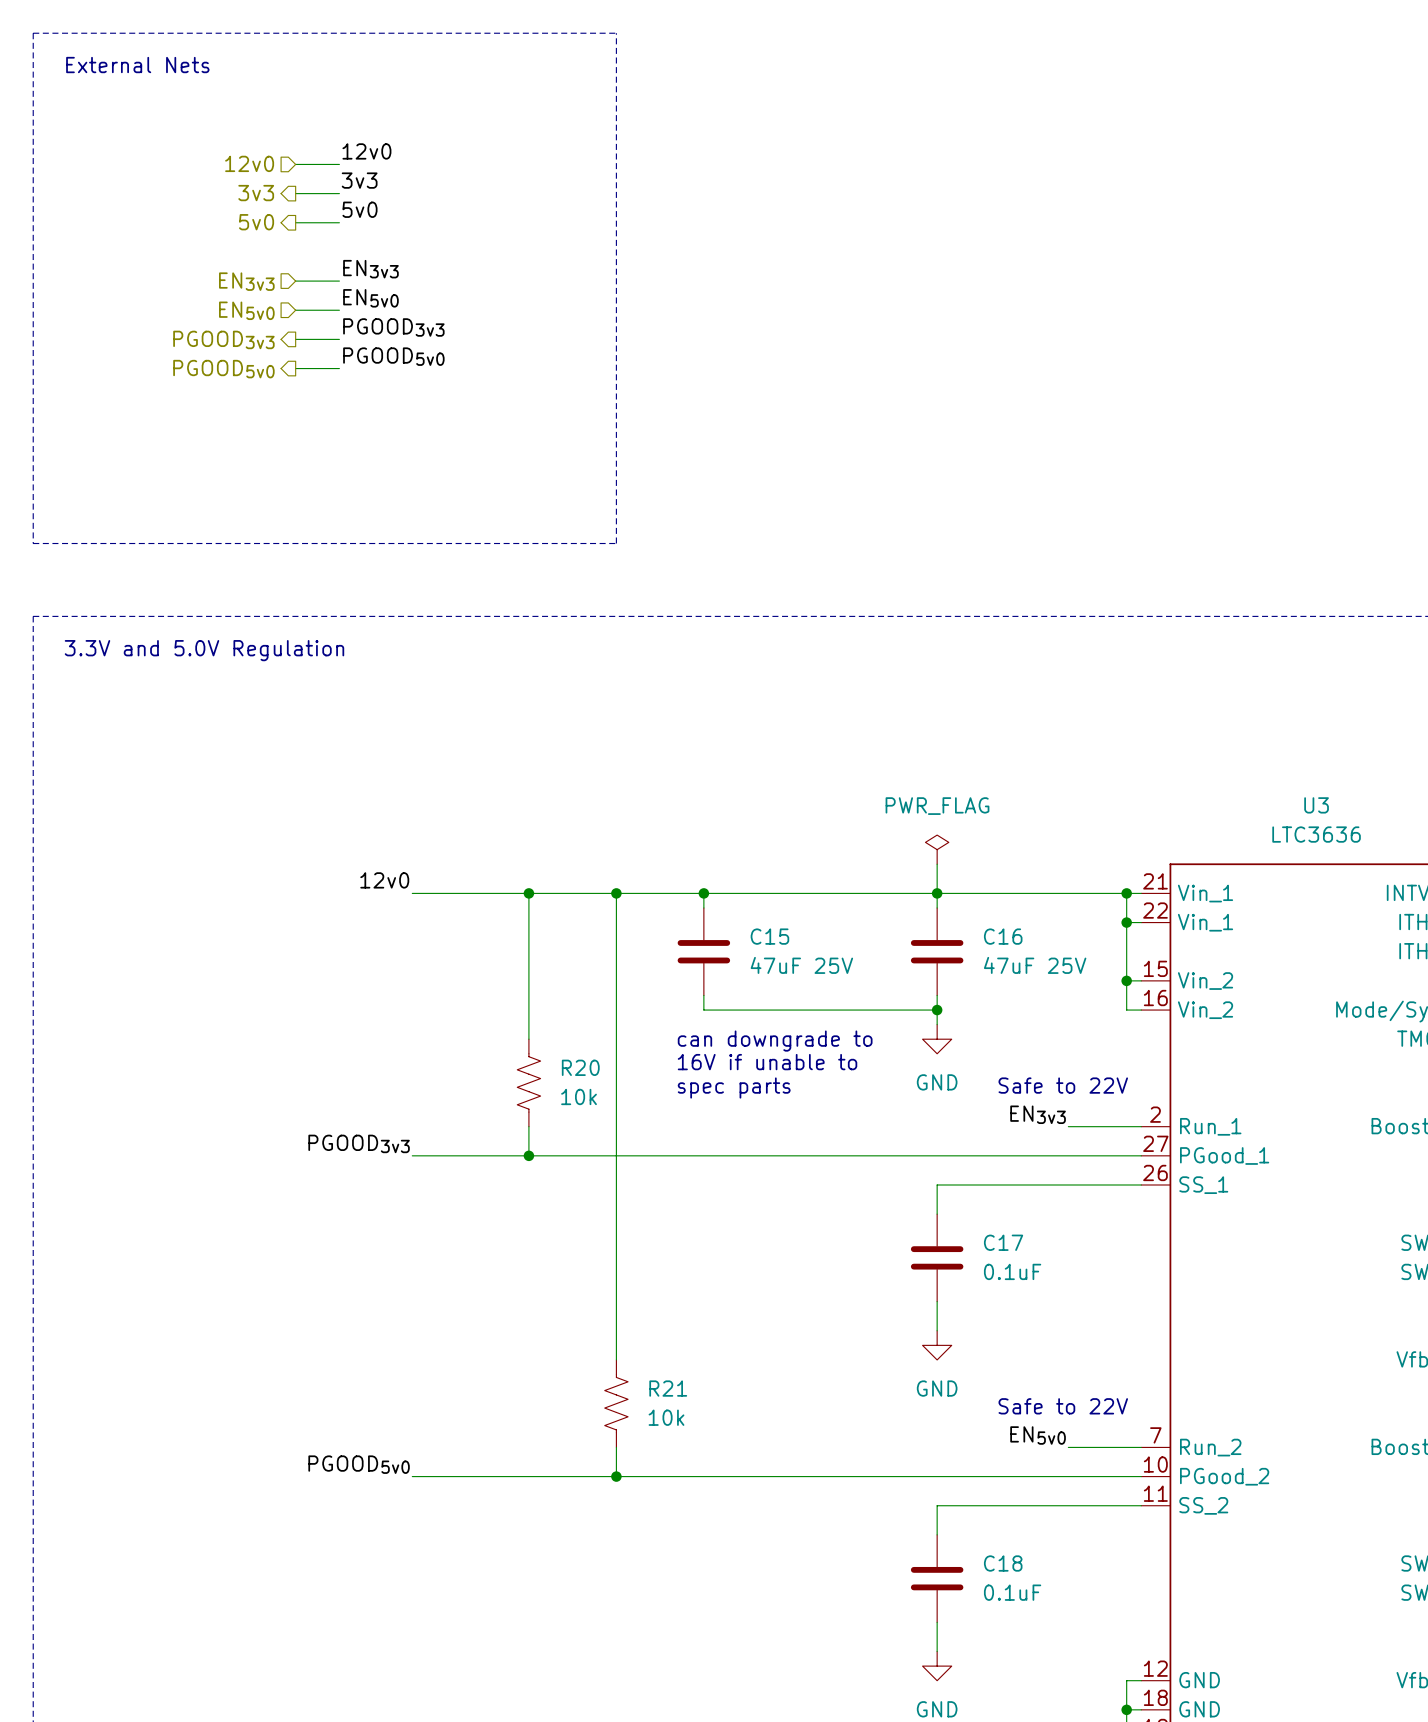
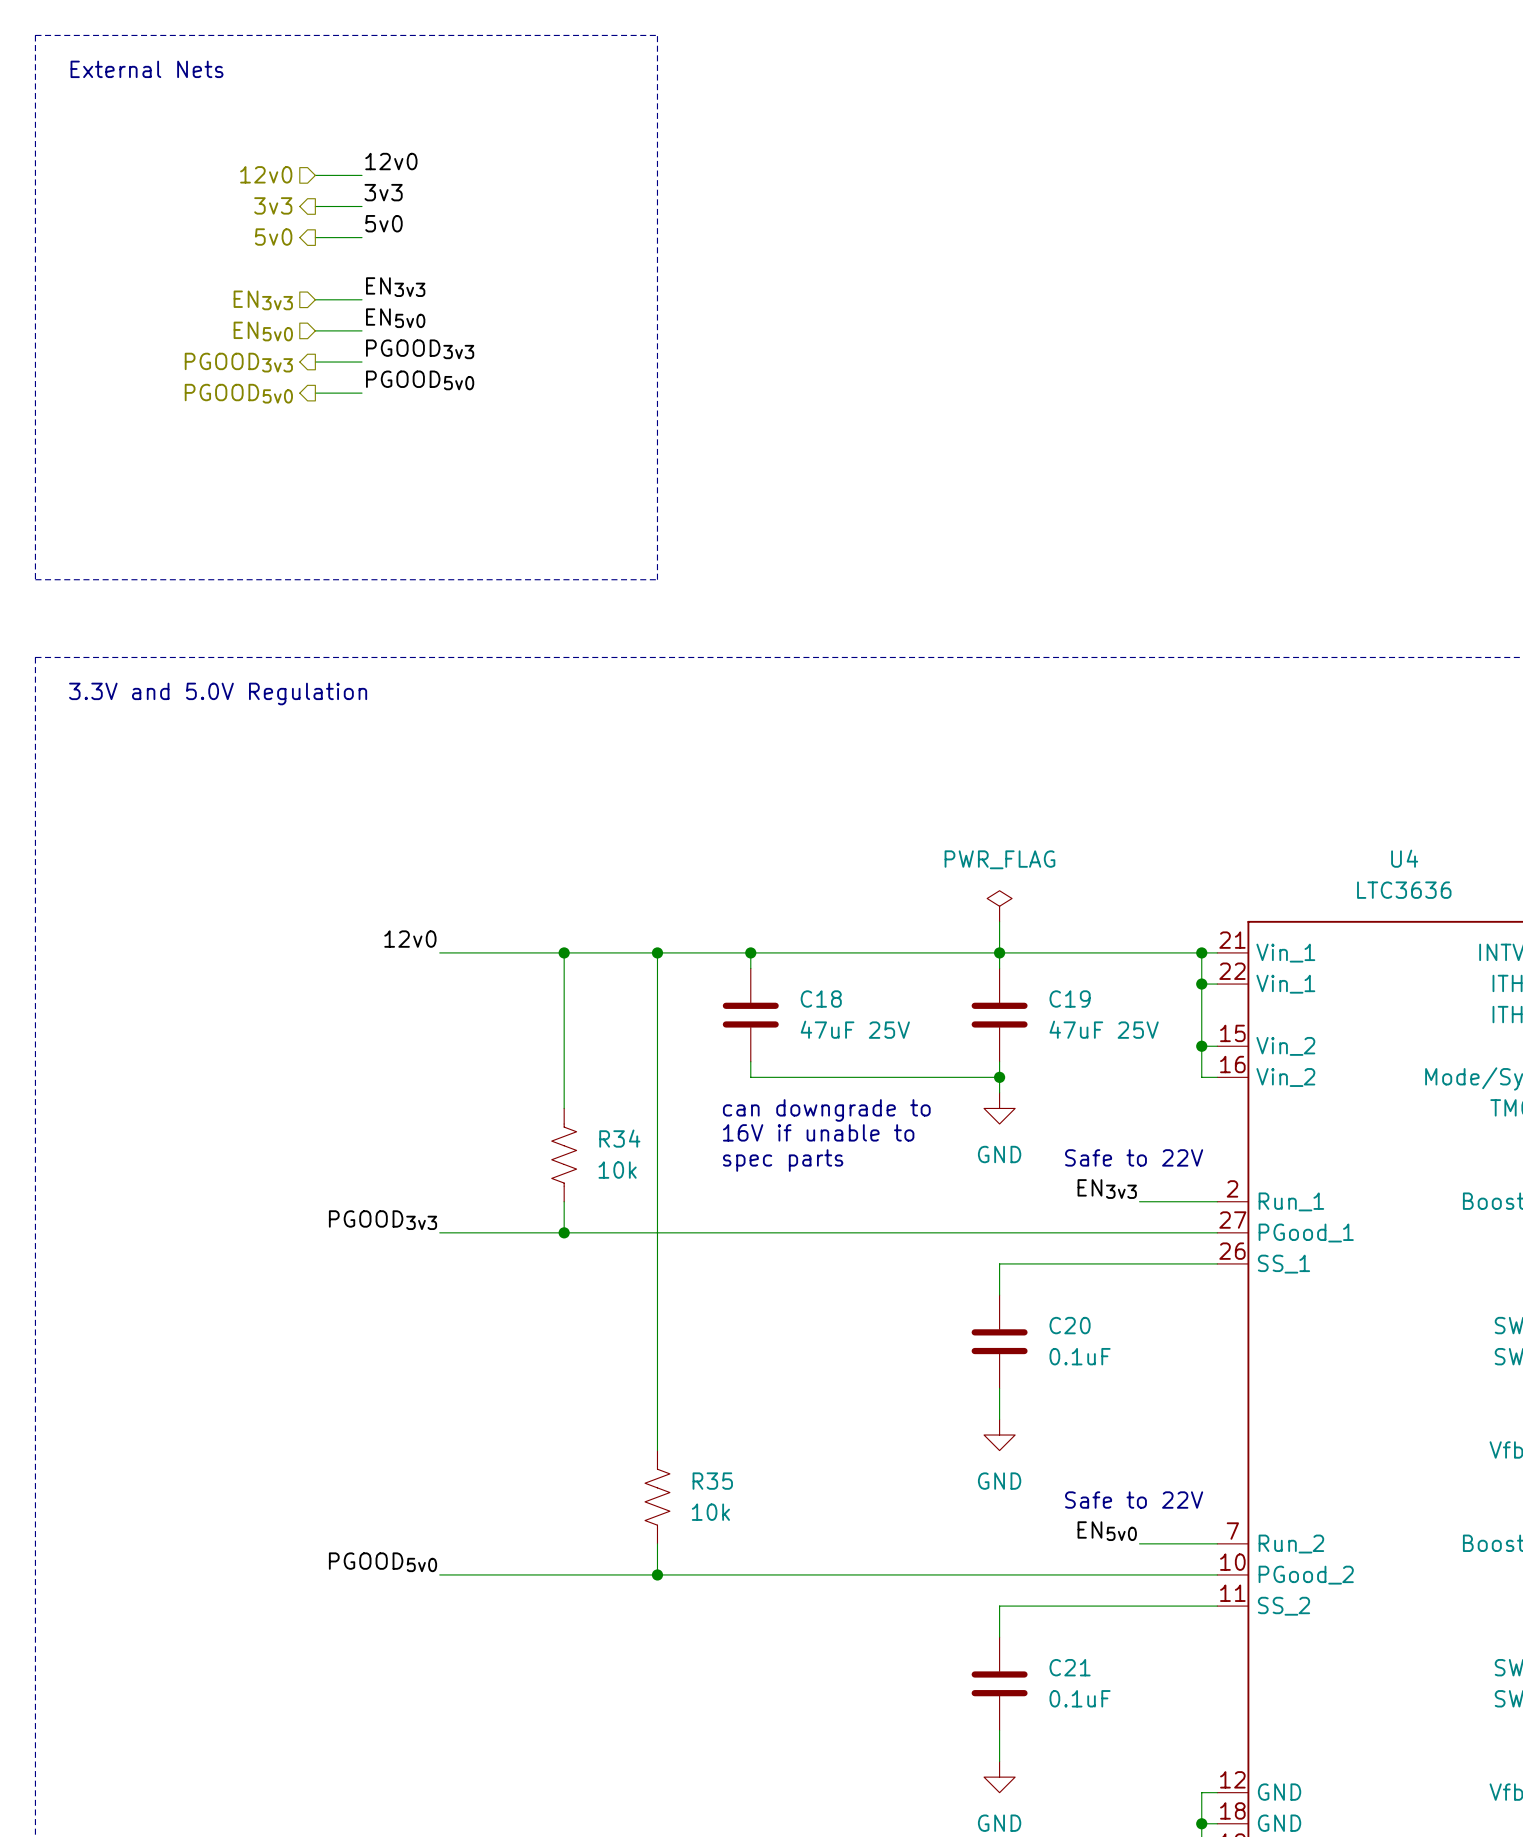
U3 name: U3 (1316, 805) -> U4 (1404, 858)
C15 name: C15 (769, 936) -> C18 (821, 999)
C16 name: C16 (1003, 936) -> C19 (1070, 999)
R20 name: R20 (580, 1067) -> R34 (619, 1138)
C17 name: C17 (1003, 1242) -> C20 (1070, 1325)
R21 name: R21 (668, 1388) -> R35 (712, 1481)
C18 name: C18 (1003, 1563) -> C21 (1070, 1667)

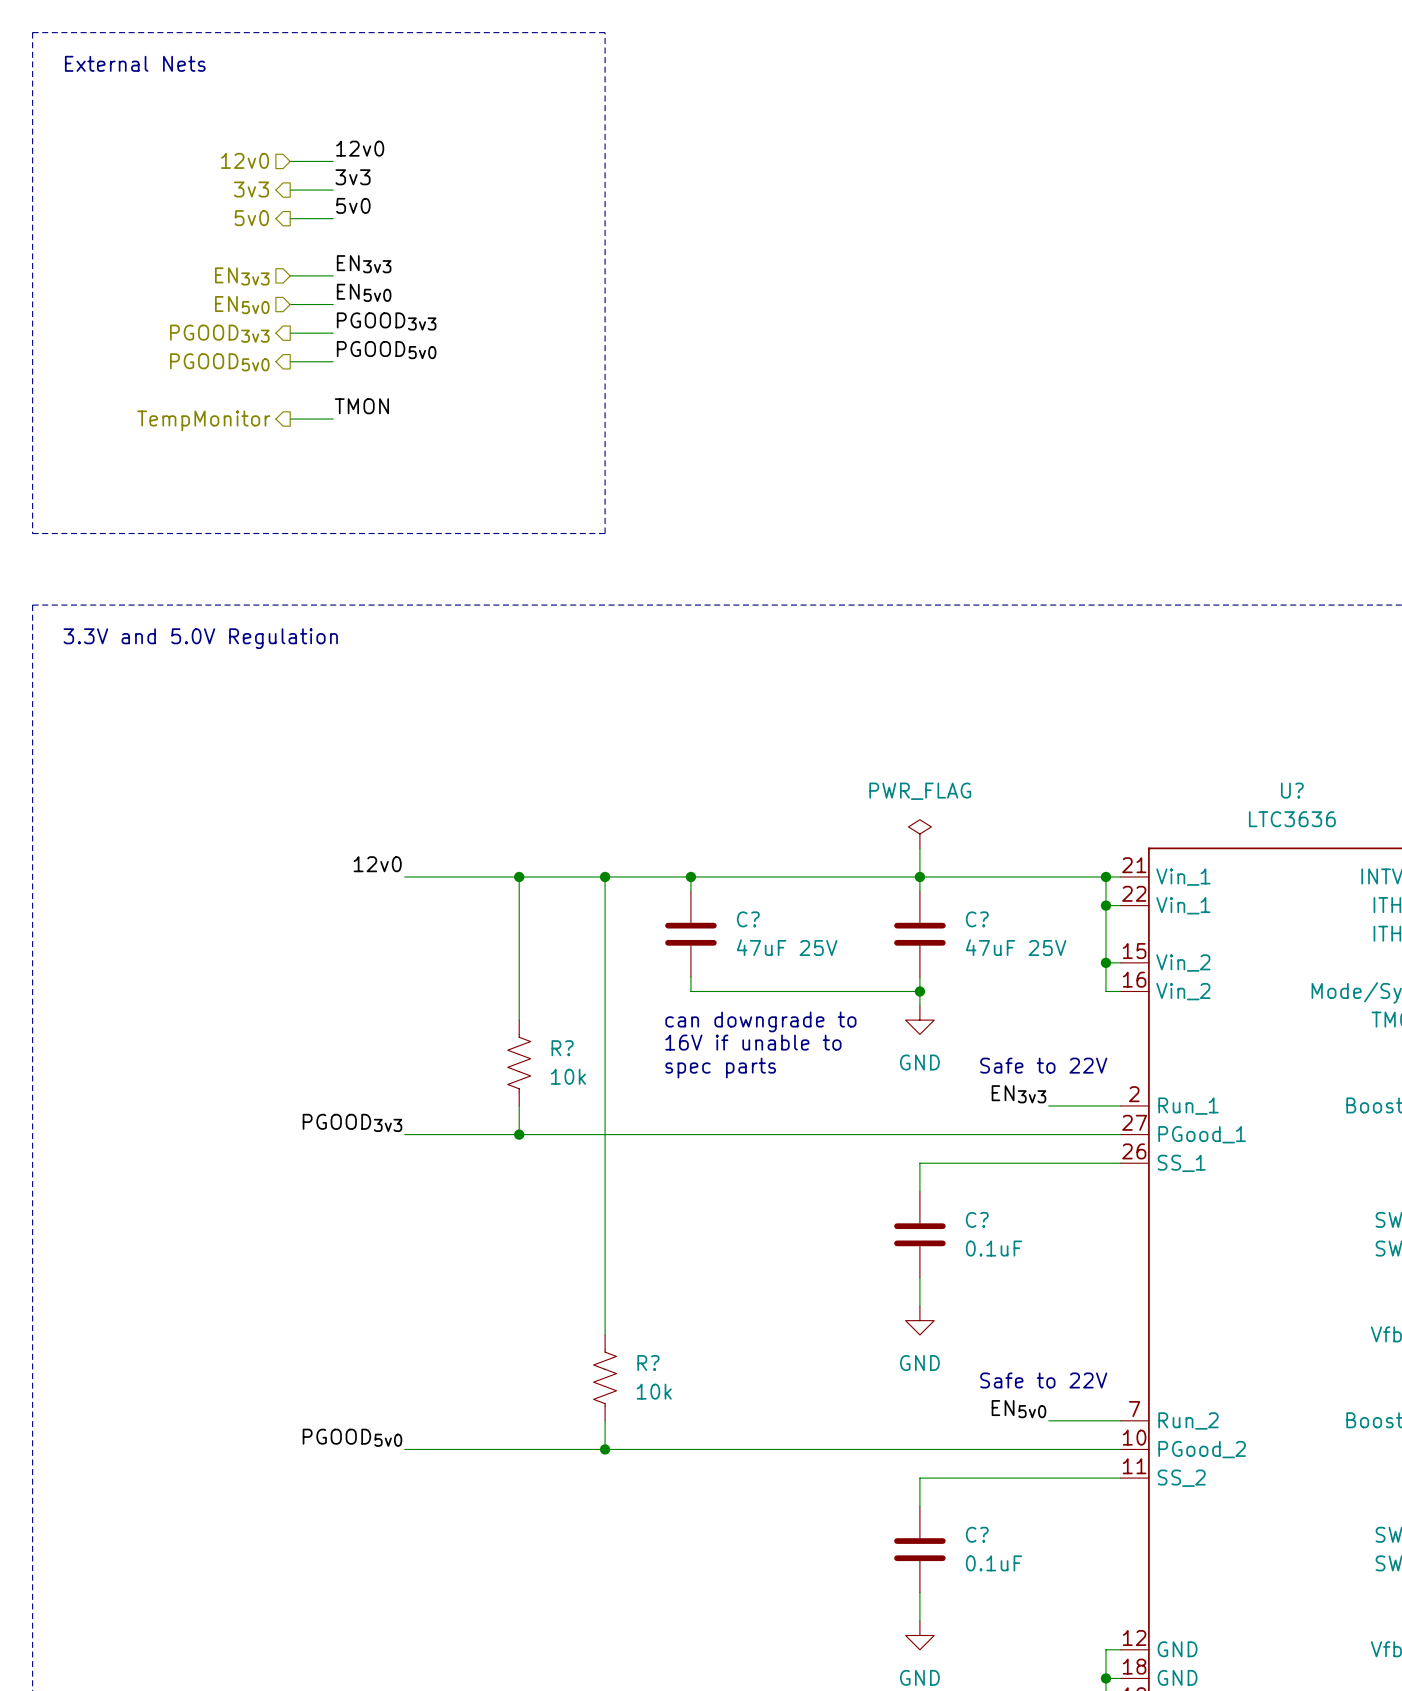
label: none -> TMON (361, 406)
wire: none -> (290, 419) (333, 419)
hierarchical label: none -> TempMonitor (203, 420)
U4 name: U4 (1404, 858) -> U? (1292, 790)
C18 name: C18 (821, 999) -> C? (748, 919)
C19 name: C19 (1070, 999) -> C? (977, 919)
R34 name: R34 (619, 1138) -> R? (562, 1048)
C20 name: C20 (1070, 1325) -> C? (977, 1219)
R35 name: R35 (712, 1481) -> R? (648, 1363)
C21 name: C21 (1070, 1667) -> C? (977, 1534)

